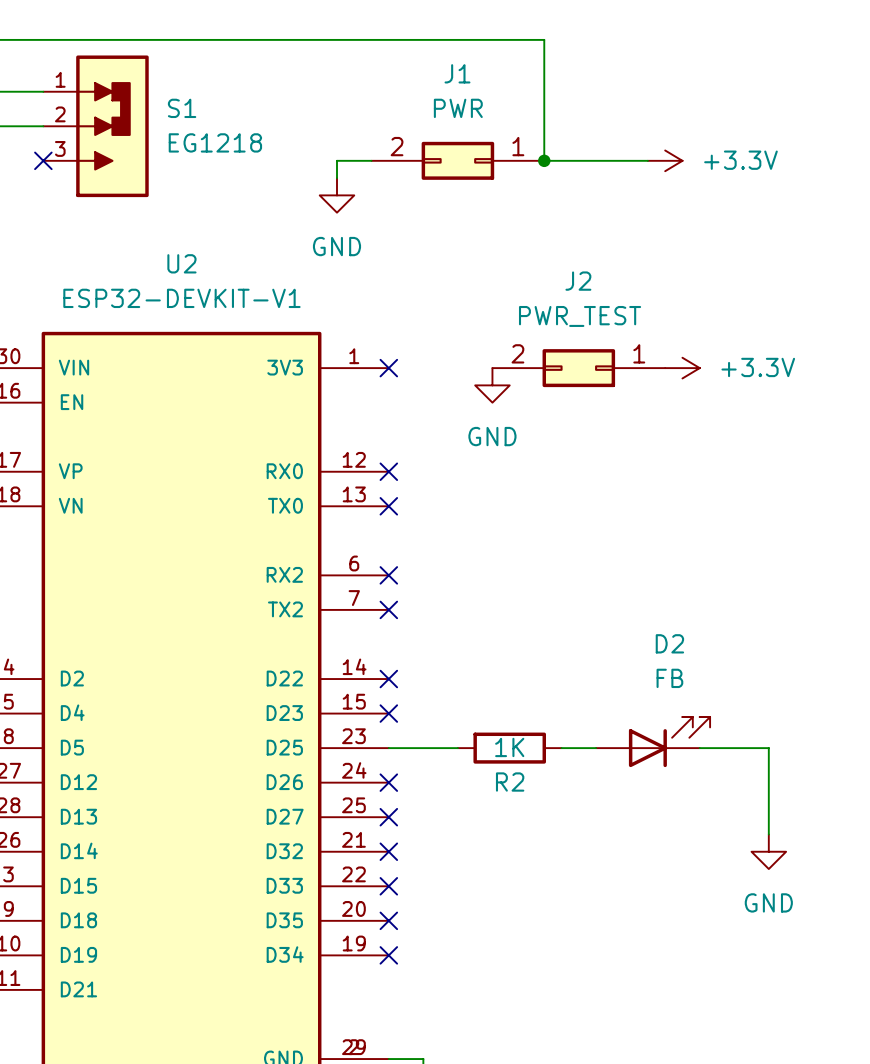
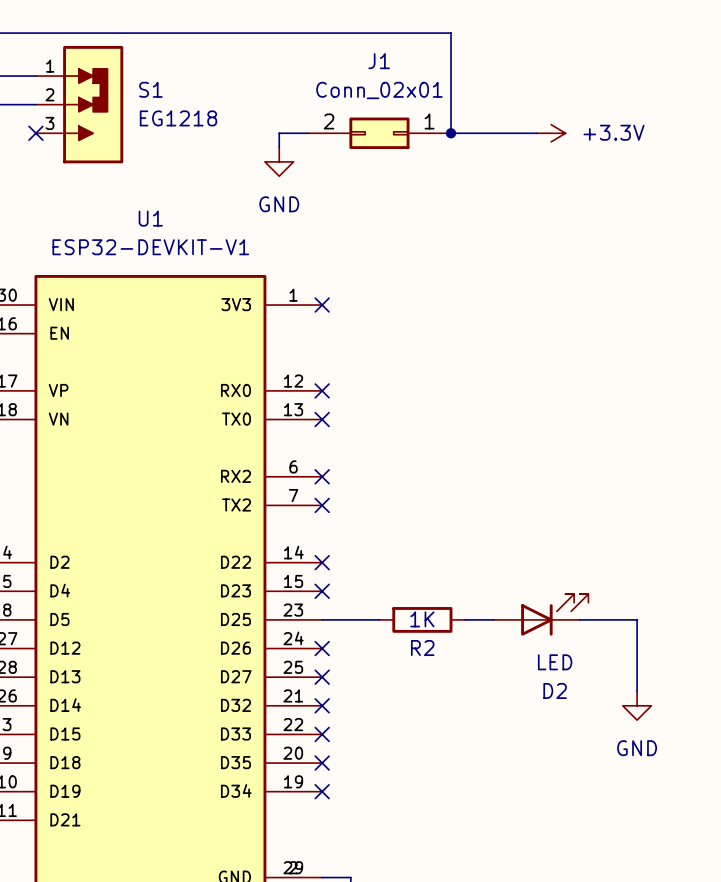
J1 value: PWR (458, 108) -> Conn_02x01 (379, 90)
U2 name: U2 (181, 263) -> U1 (150, 218)
J2: PWR_TEST (578, 368) -> none
power symbol: +3.3V (682, 368) -> none
power symbol: GND (492, 385) -> none
D2 name position: D2 (669, 643) -> D2 (555, 690)
D2 value: FB (669, 678) -> LED (555, 662)

